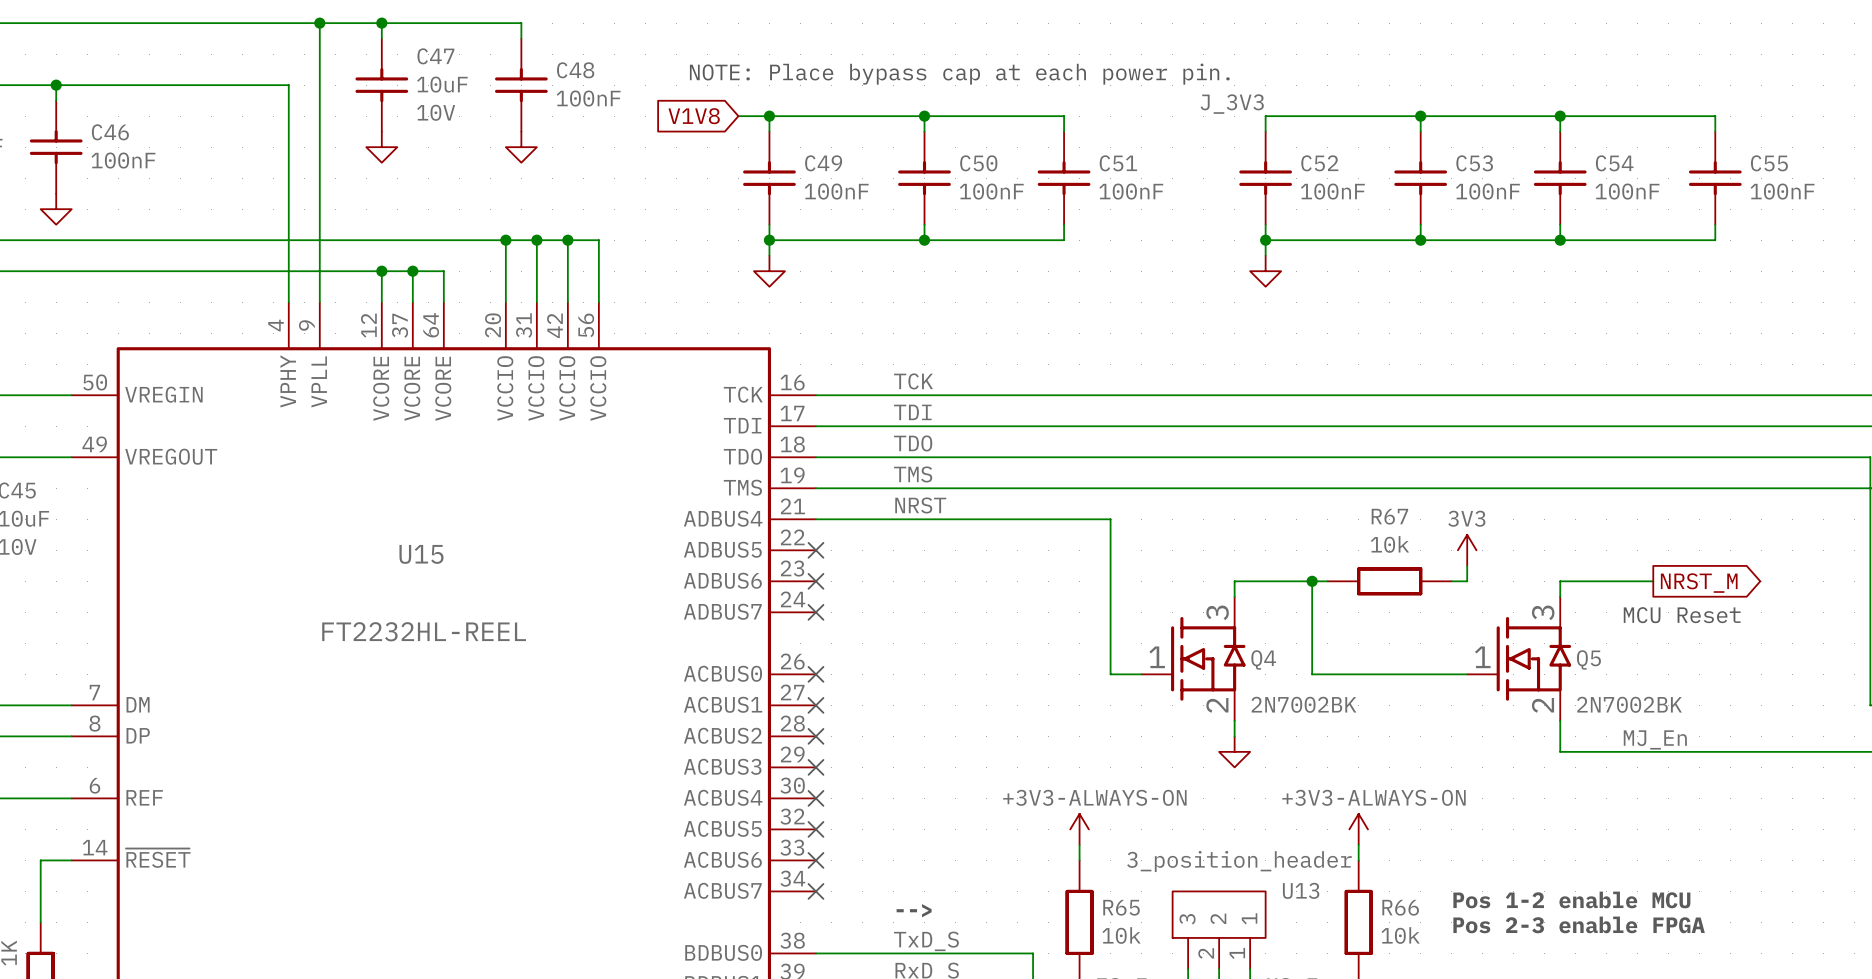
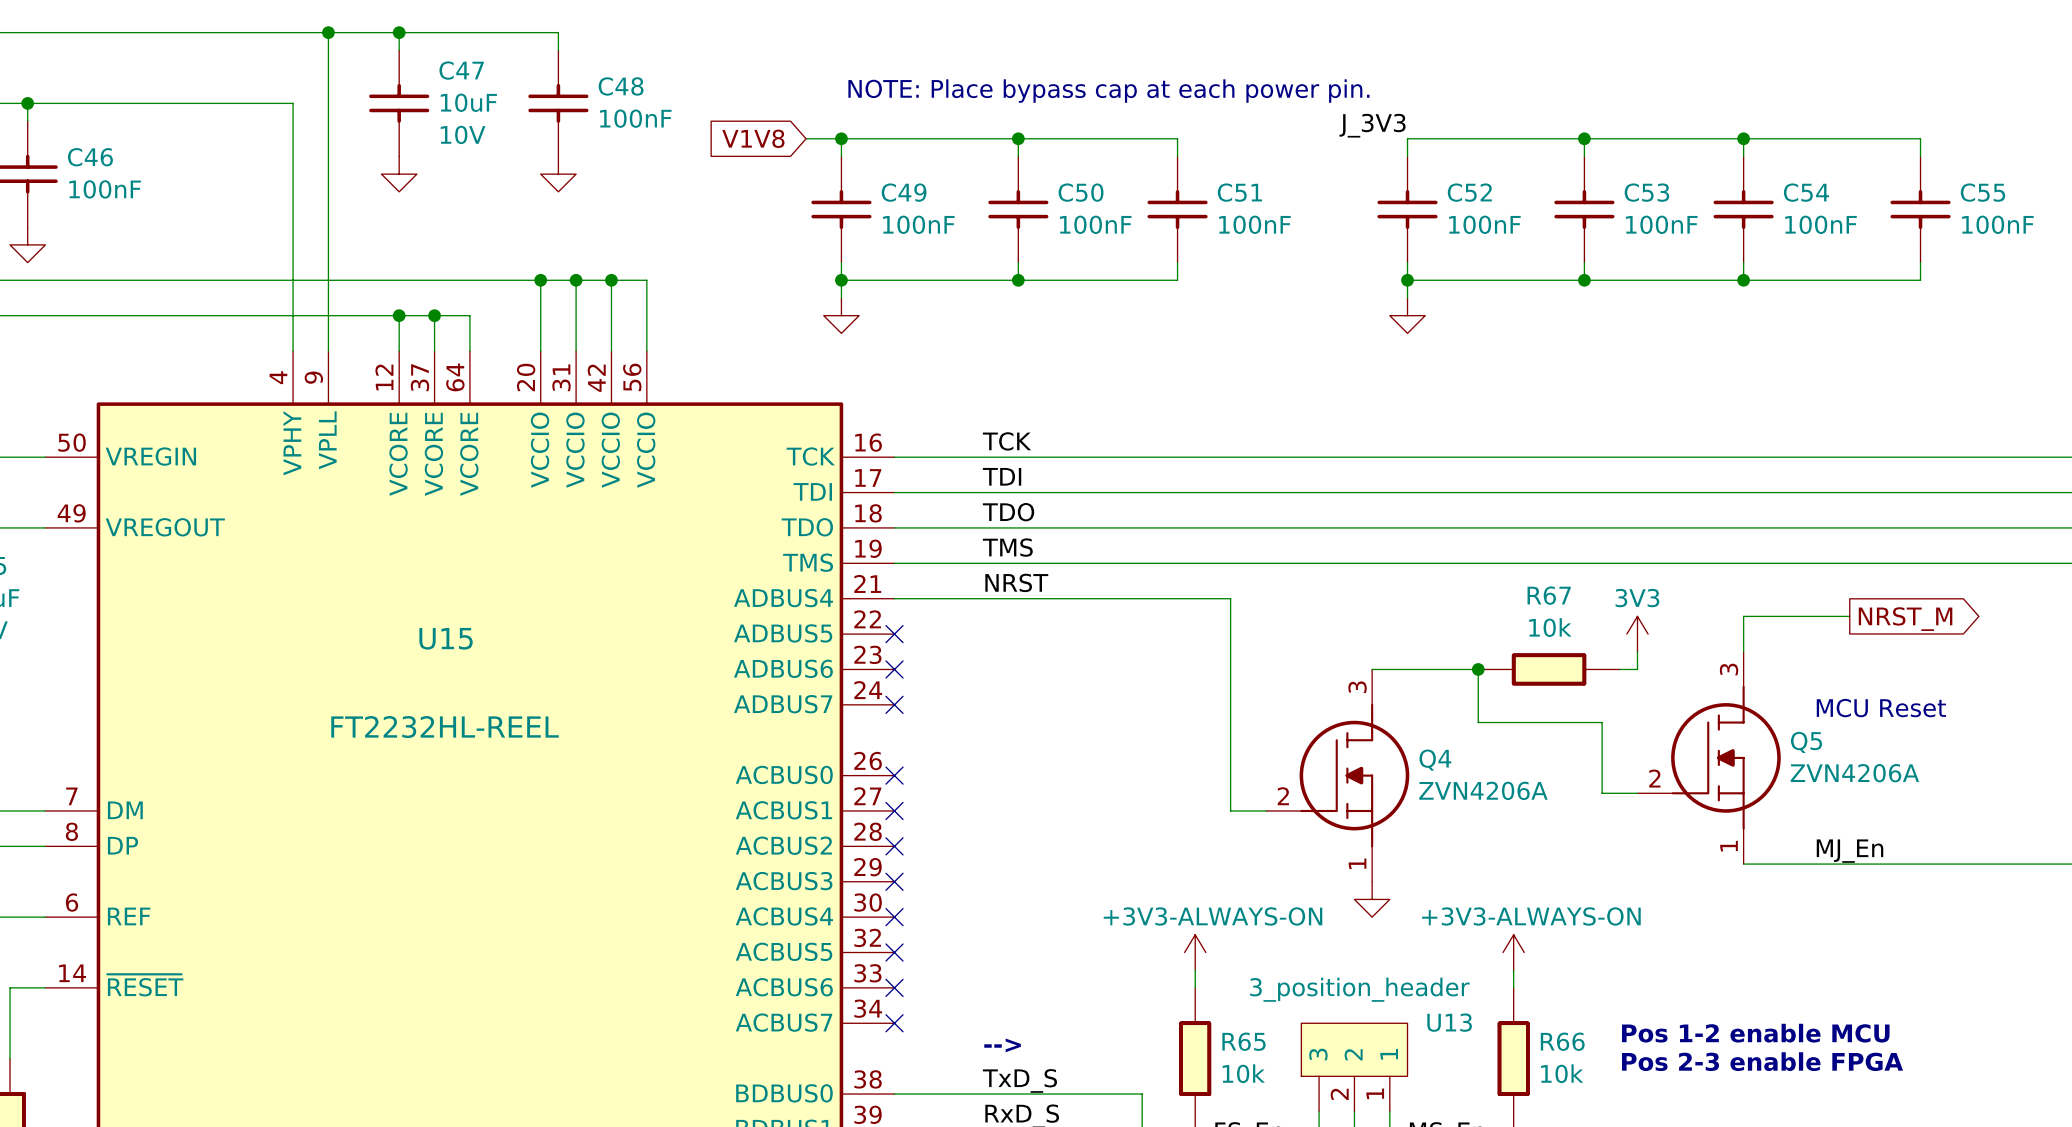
wire: none -> (1849, 616) (1743, 616) (1743, 651)
wire: (1312, 581) (1312, 674) (1467, 674) -> none
junction position: (1312, 581) -> (1478, 669)
wire: none -> (1478, 669) (1478, 722) (1602, 722) (1602, 793) (1637, 793)
wire: (1653, 581) (1560, 581) (1560, 596) -> none
global label position: NRST_M (1699, 583) -> NRST_M (1905, 619)
Q4 symbol: [1141, 596, 1246, 721] -> [1265, 669, 1410, 882]
Q5 symbol: [1467, 596, 1572, 721] -> [1637, 651, 1781, 865]
wire: (1110, 674) (1141, 674) -> (1230, 775) (1230, 810) (1265, 810)
Q4 value: 2N7002BK (1303, 704) -> ZVN4206A (1483, 790)
Q5 value: 2N7002BK (1629, 704) -> ZVN4206A (1854, 773)
power symbol position: (1234, 751) -> (1372, 899)

